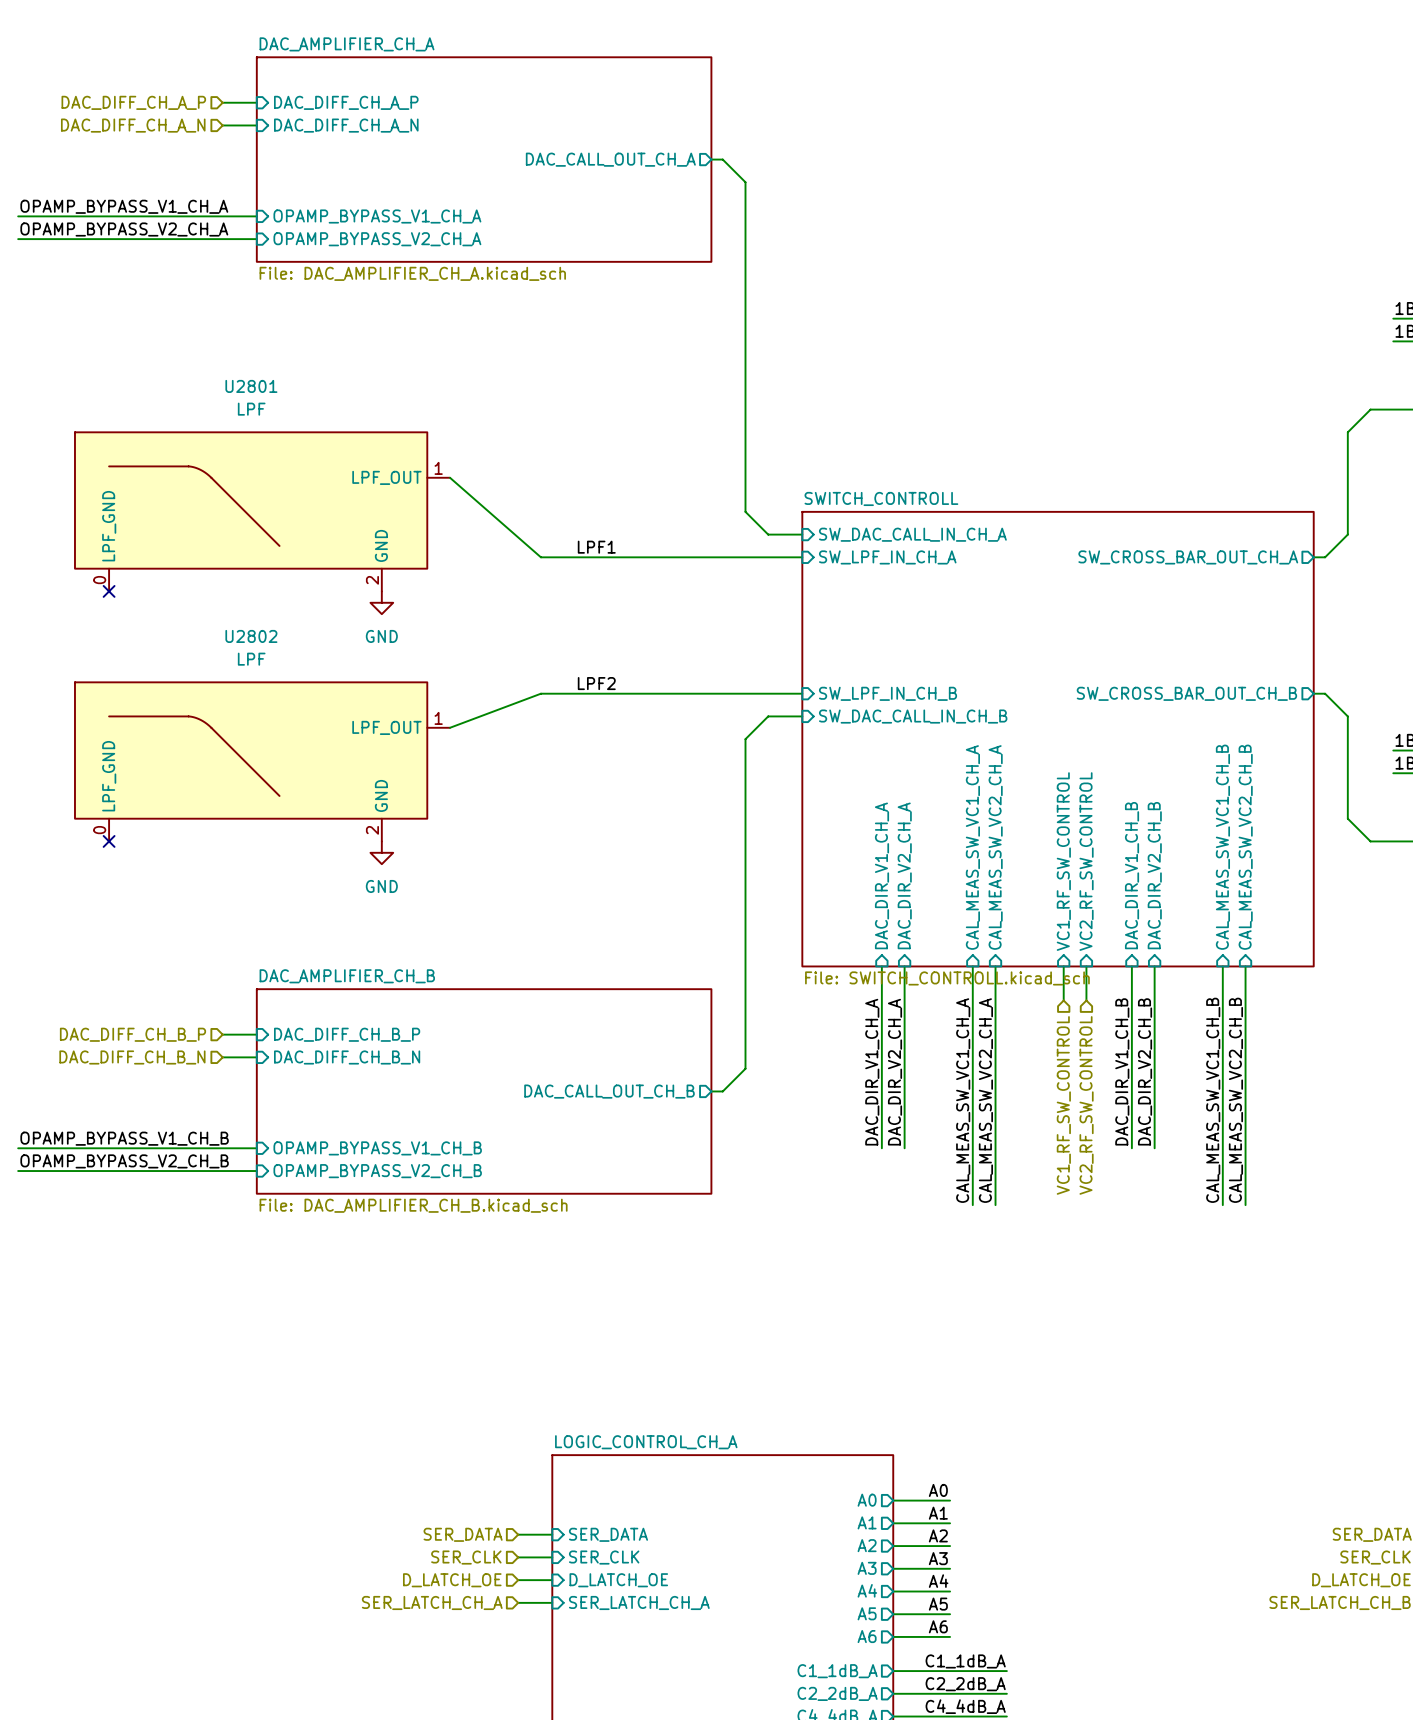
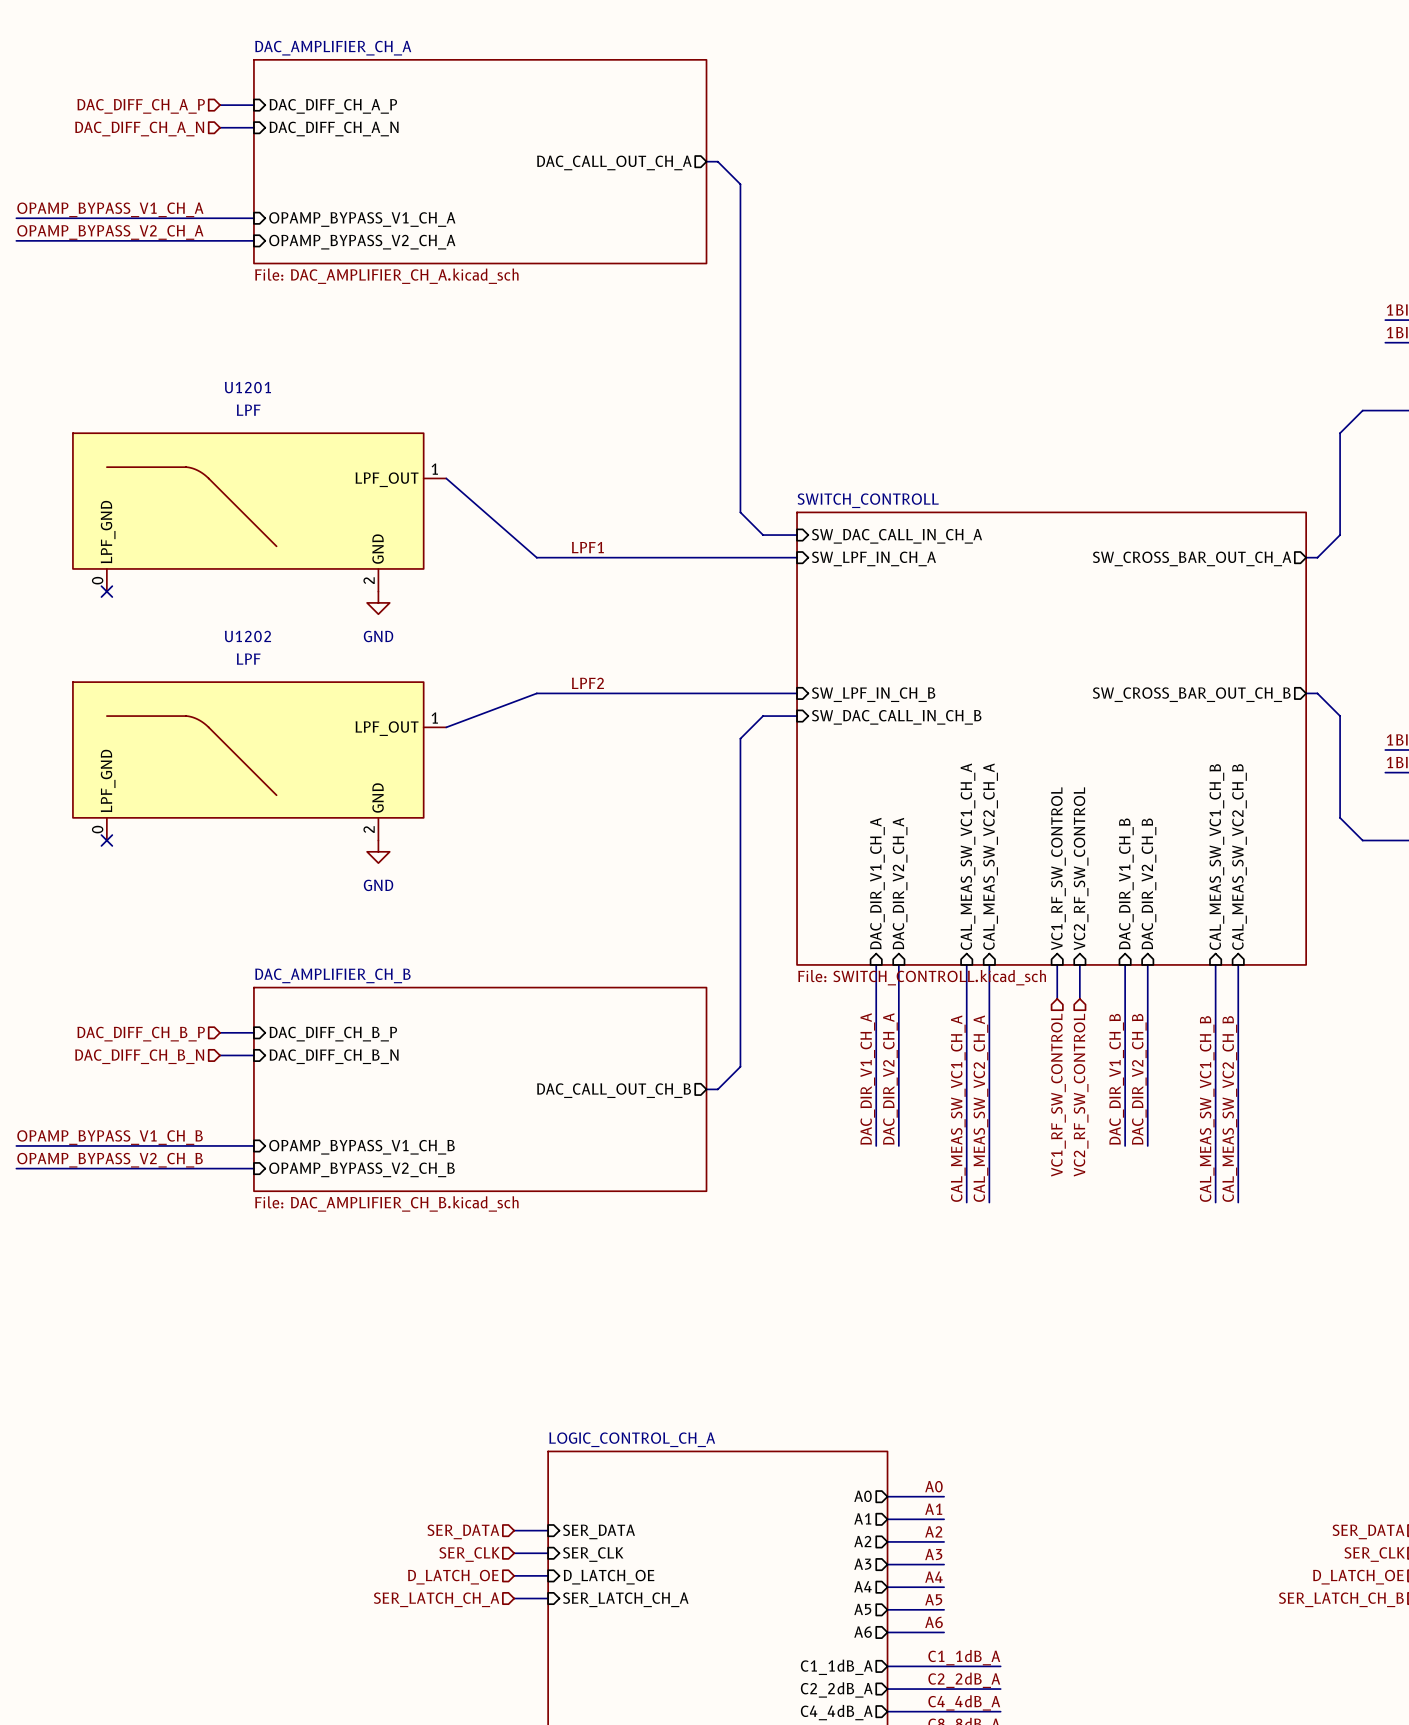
U2801 name: U2801 (251, 386) -> U1201 (247, 387)
U2802 name: U2802 (251, 636) -> U1202 (247, 636)

